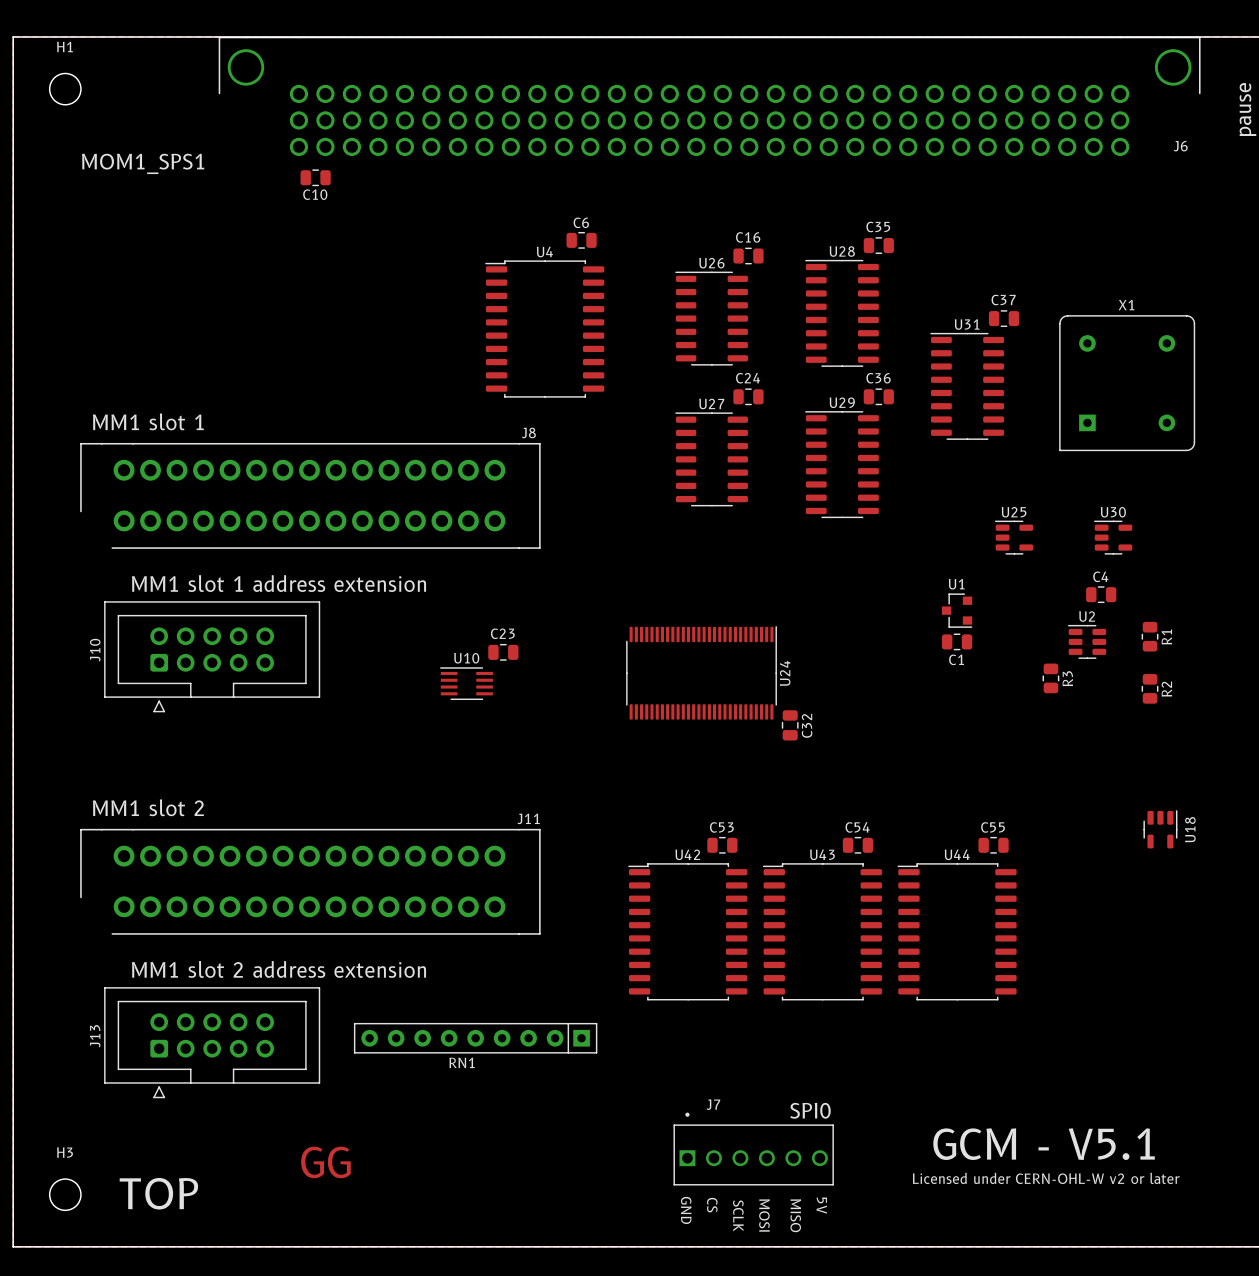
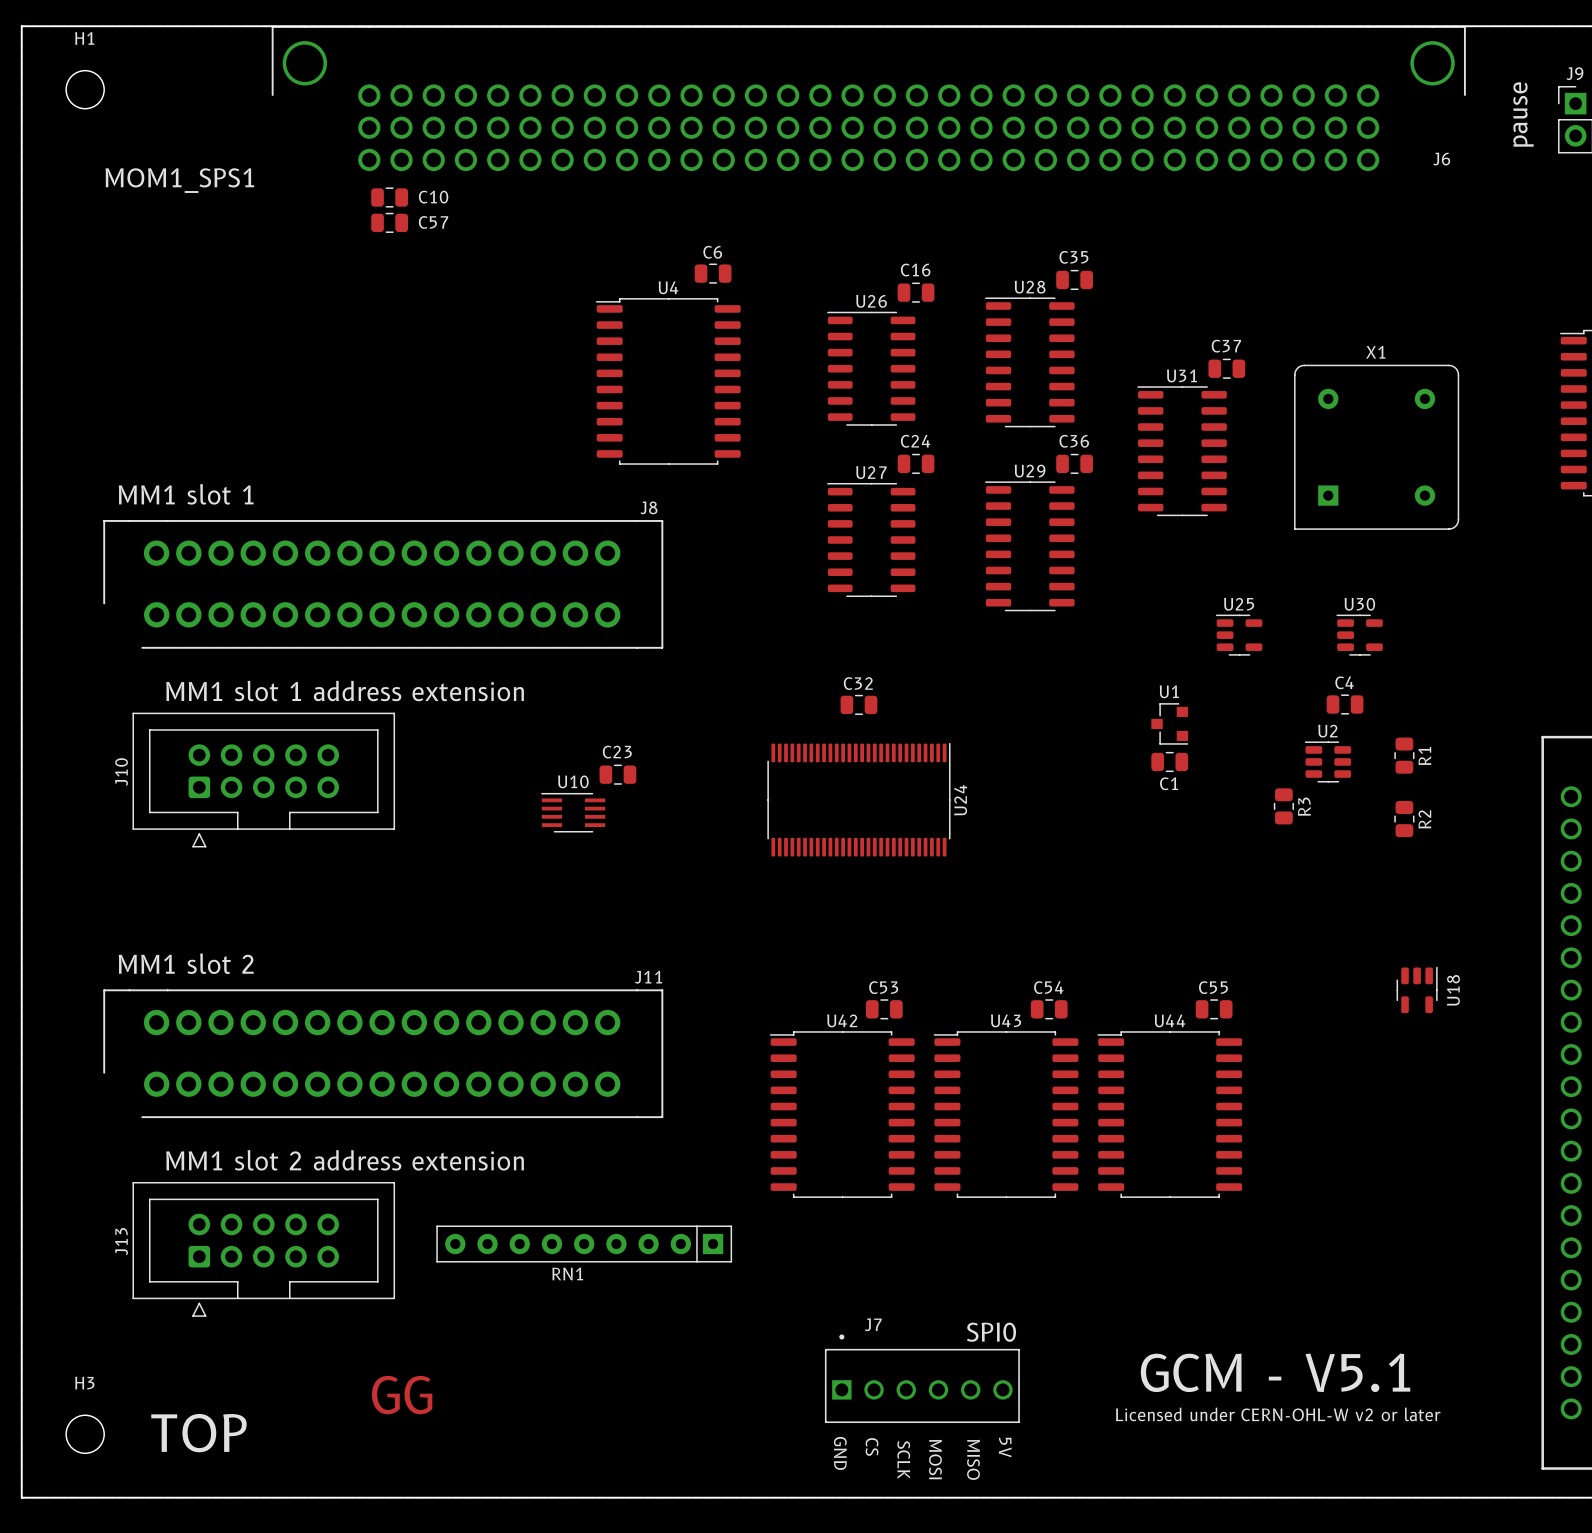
C10 name position: C10 (315, 194) -> C10 (433, 197)
C57: none -> (389, 222)
C32 rotation: 0° (790, 725) -> 90° clockwise (858, 704)
C32 position: (790, 725) -> (858, 704)
C32 name position: C32 (807, 725) -> C32 (858, 683)

